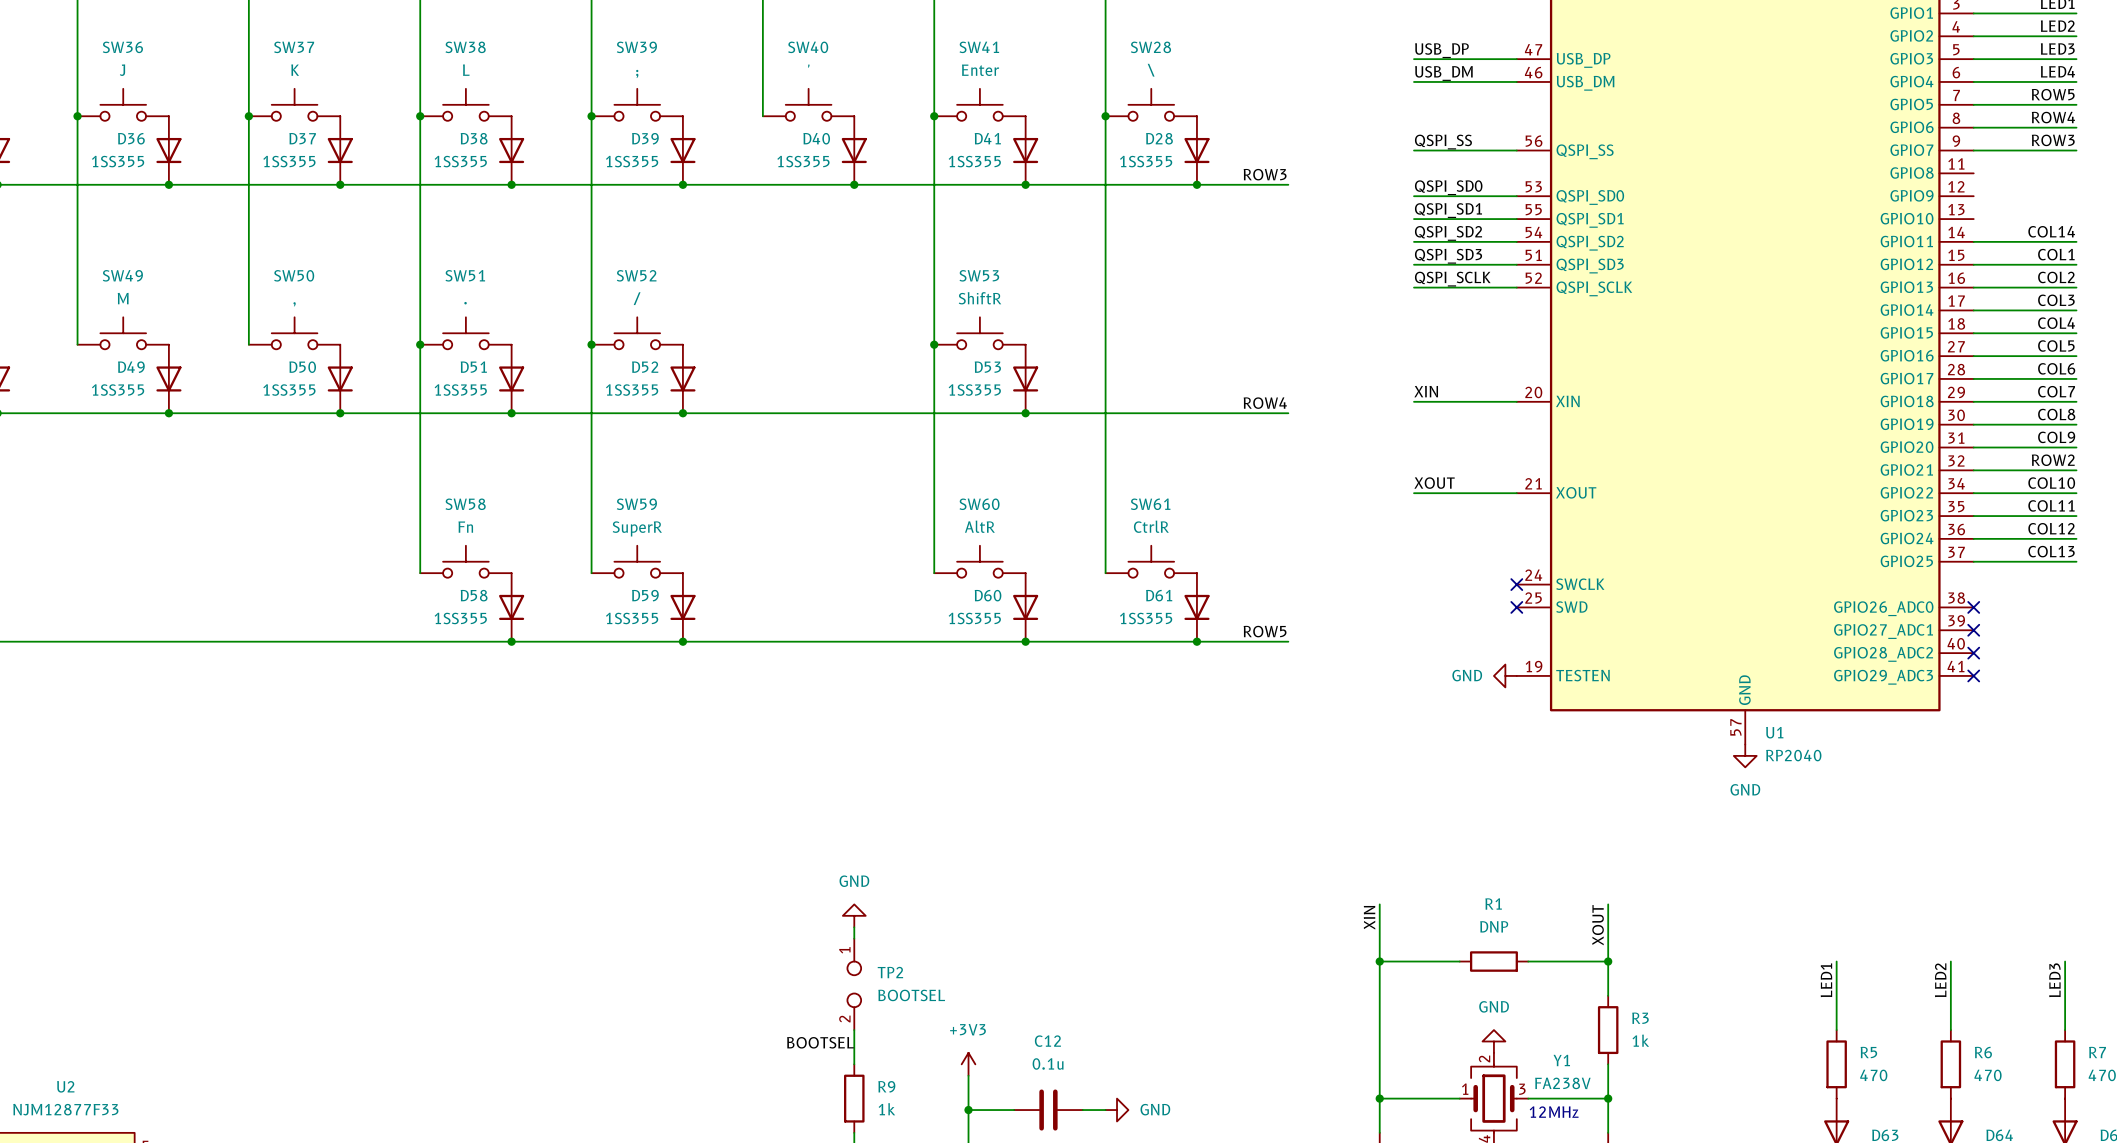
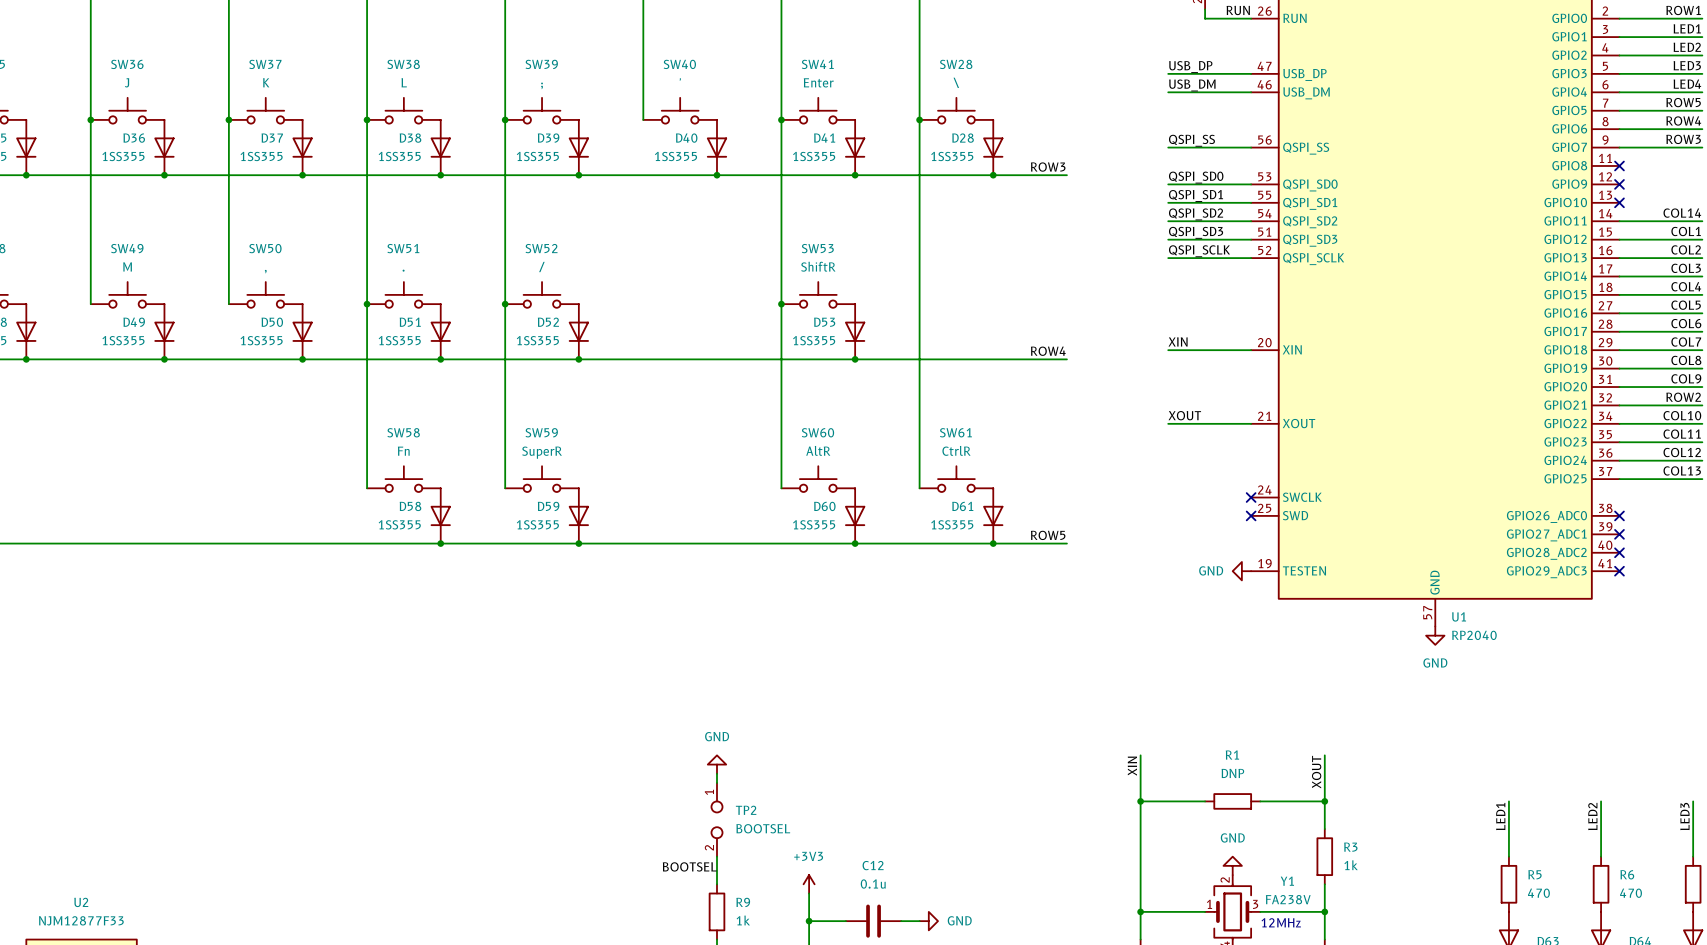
no-connect mark: none -> (1619, 165)
no-connect mark: none -> (1619, 184)
no-connect mark: none -> (1619, 202)

